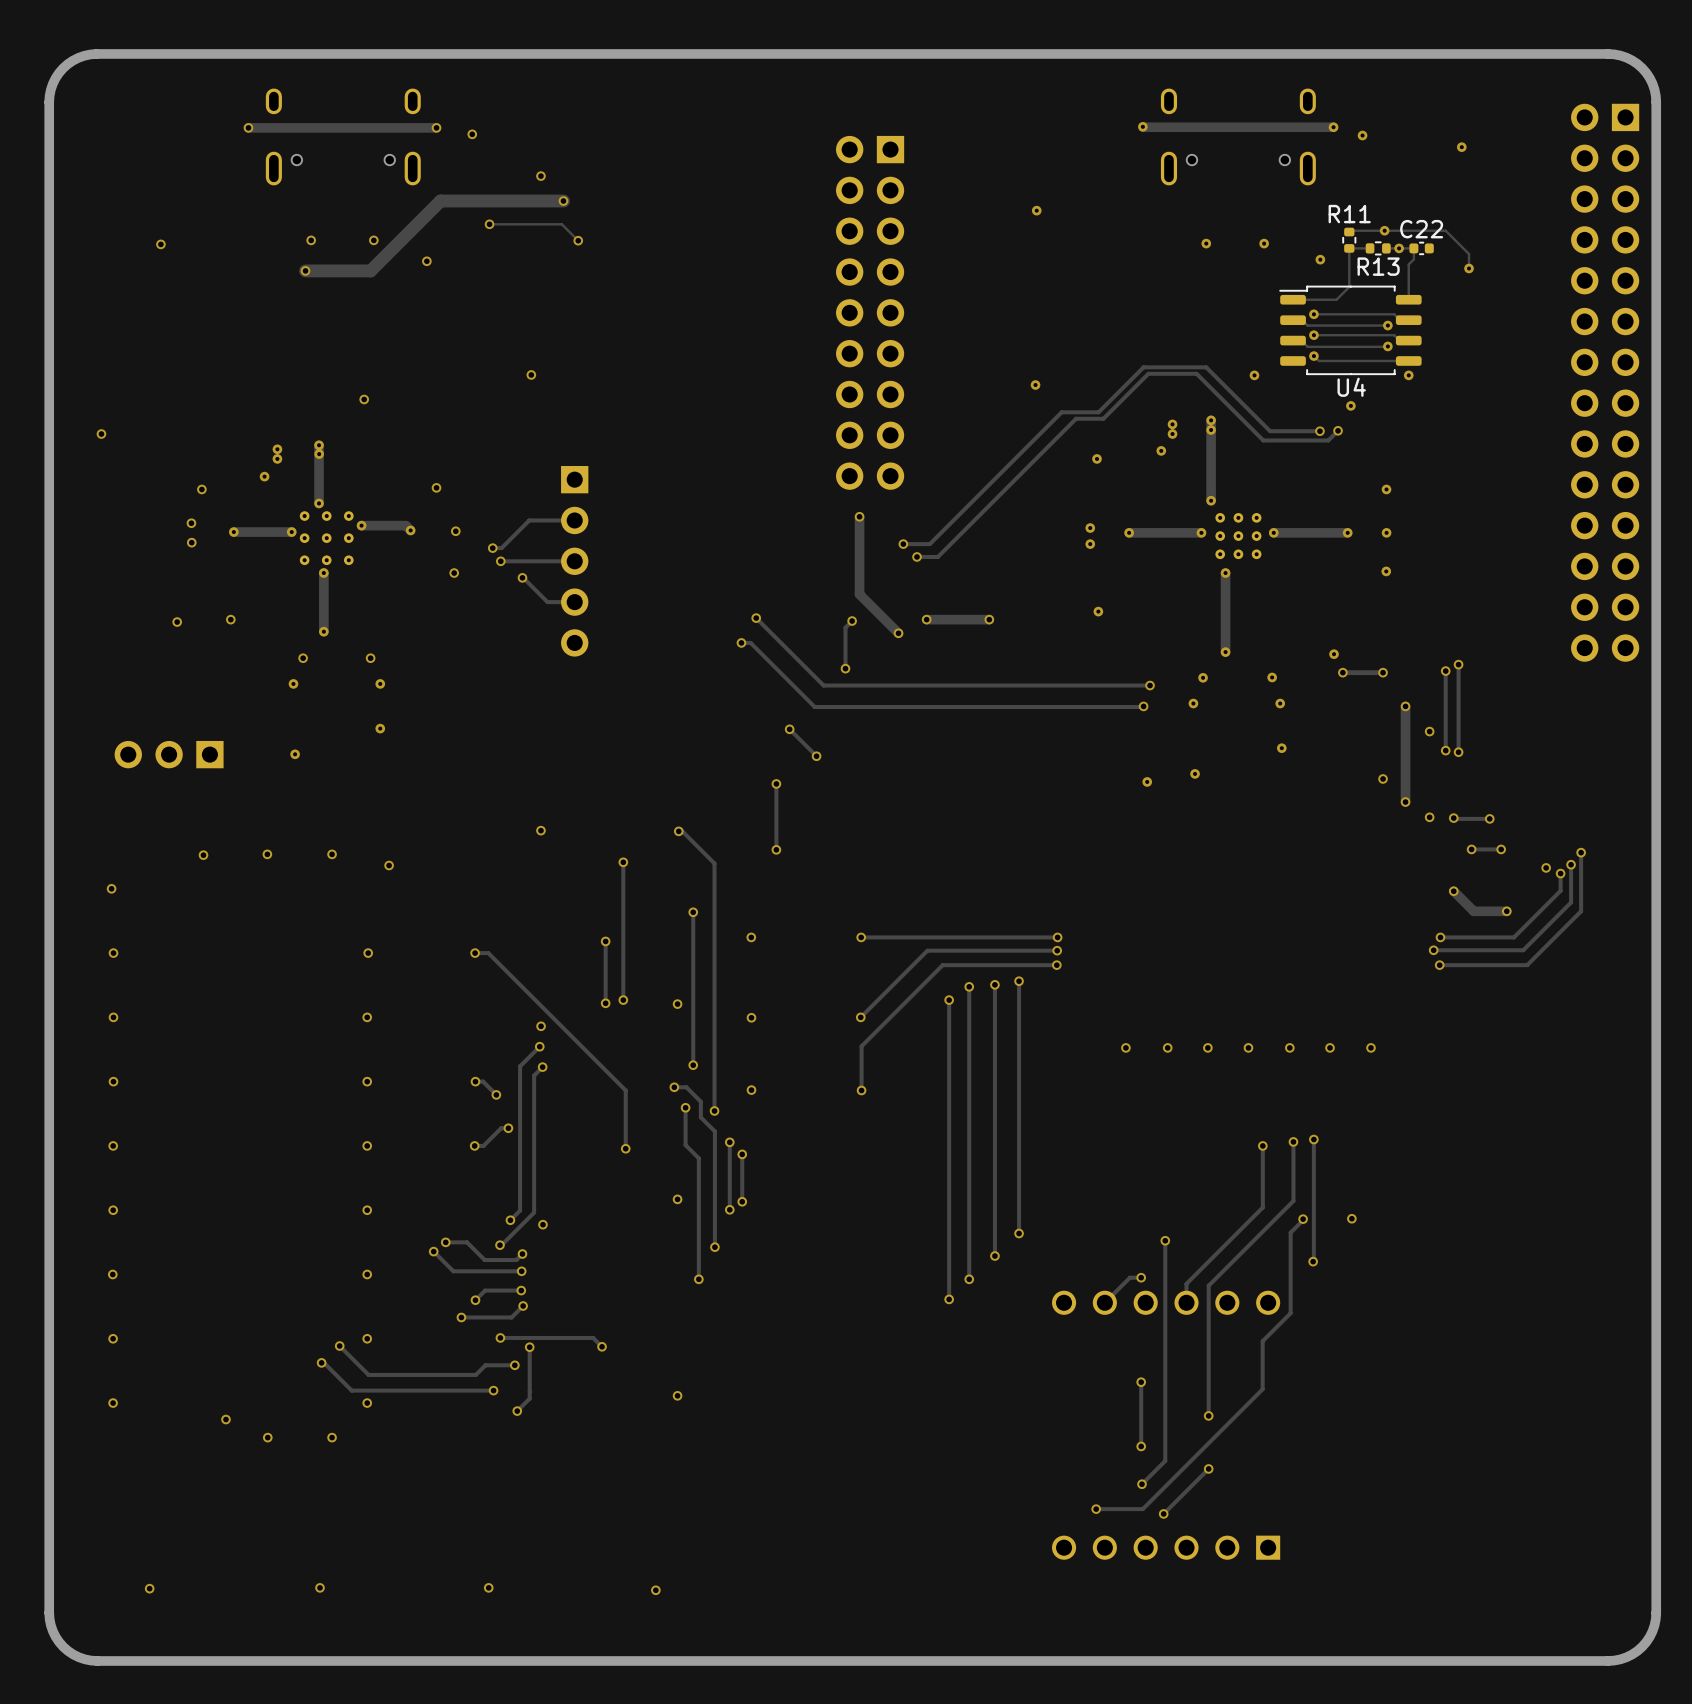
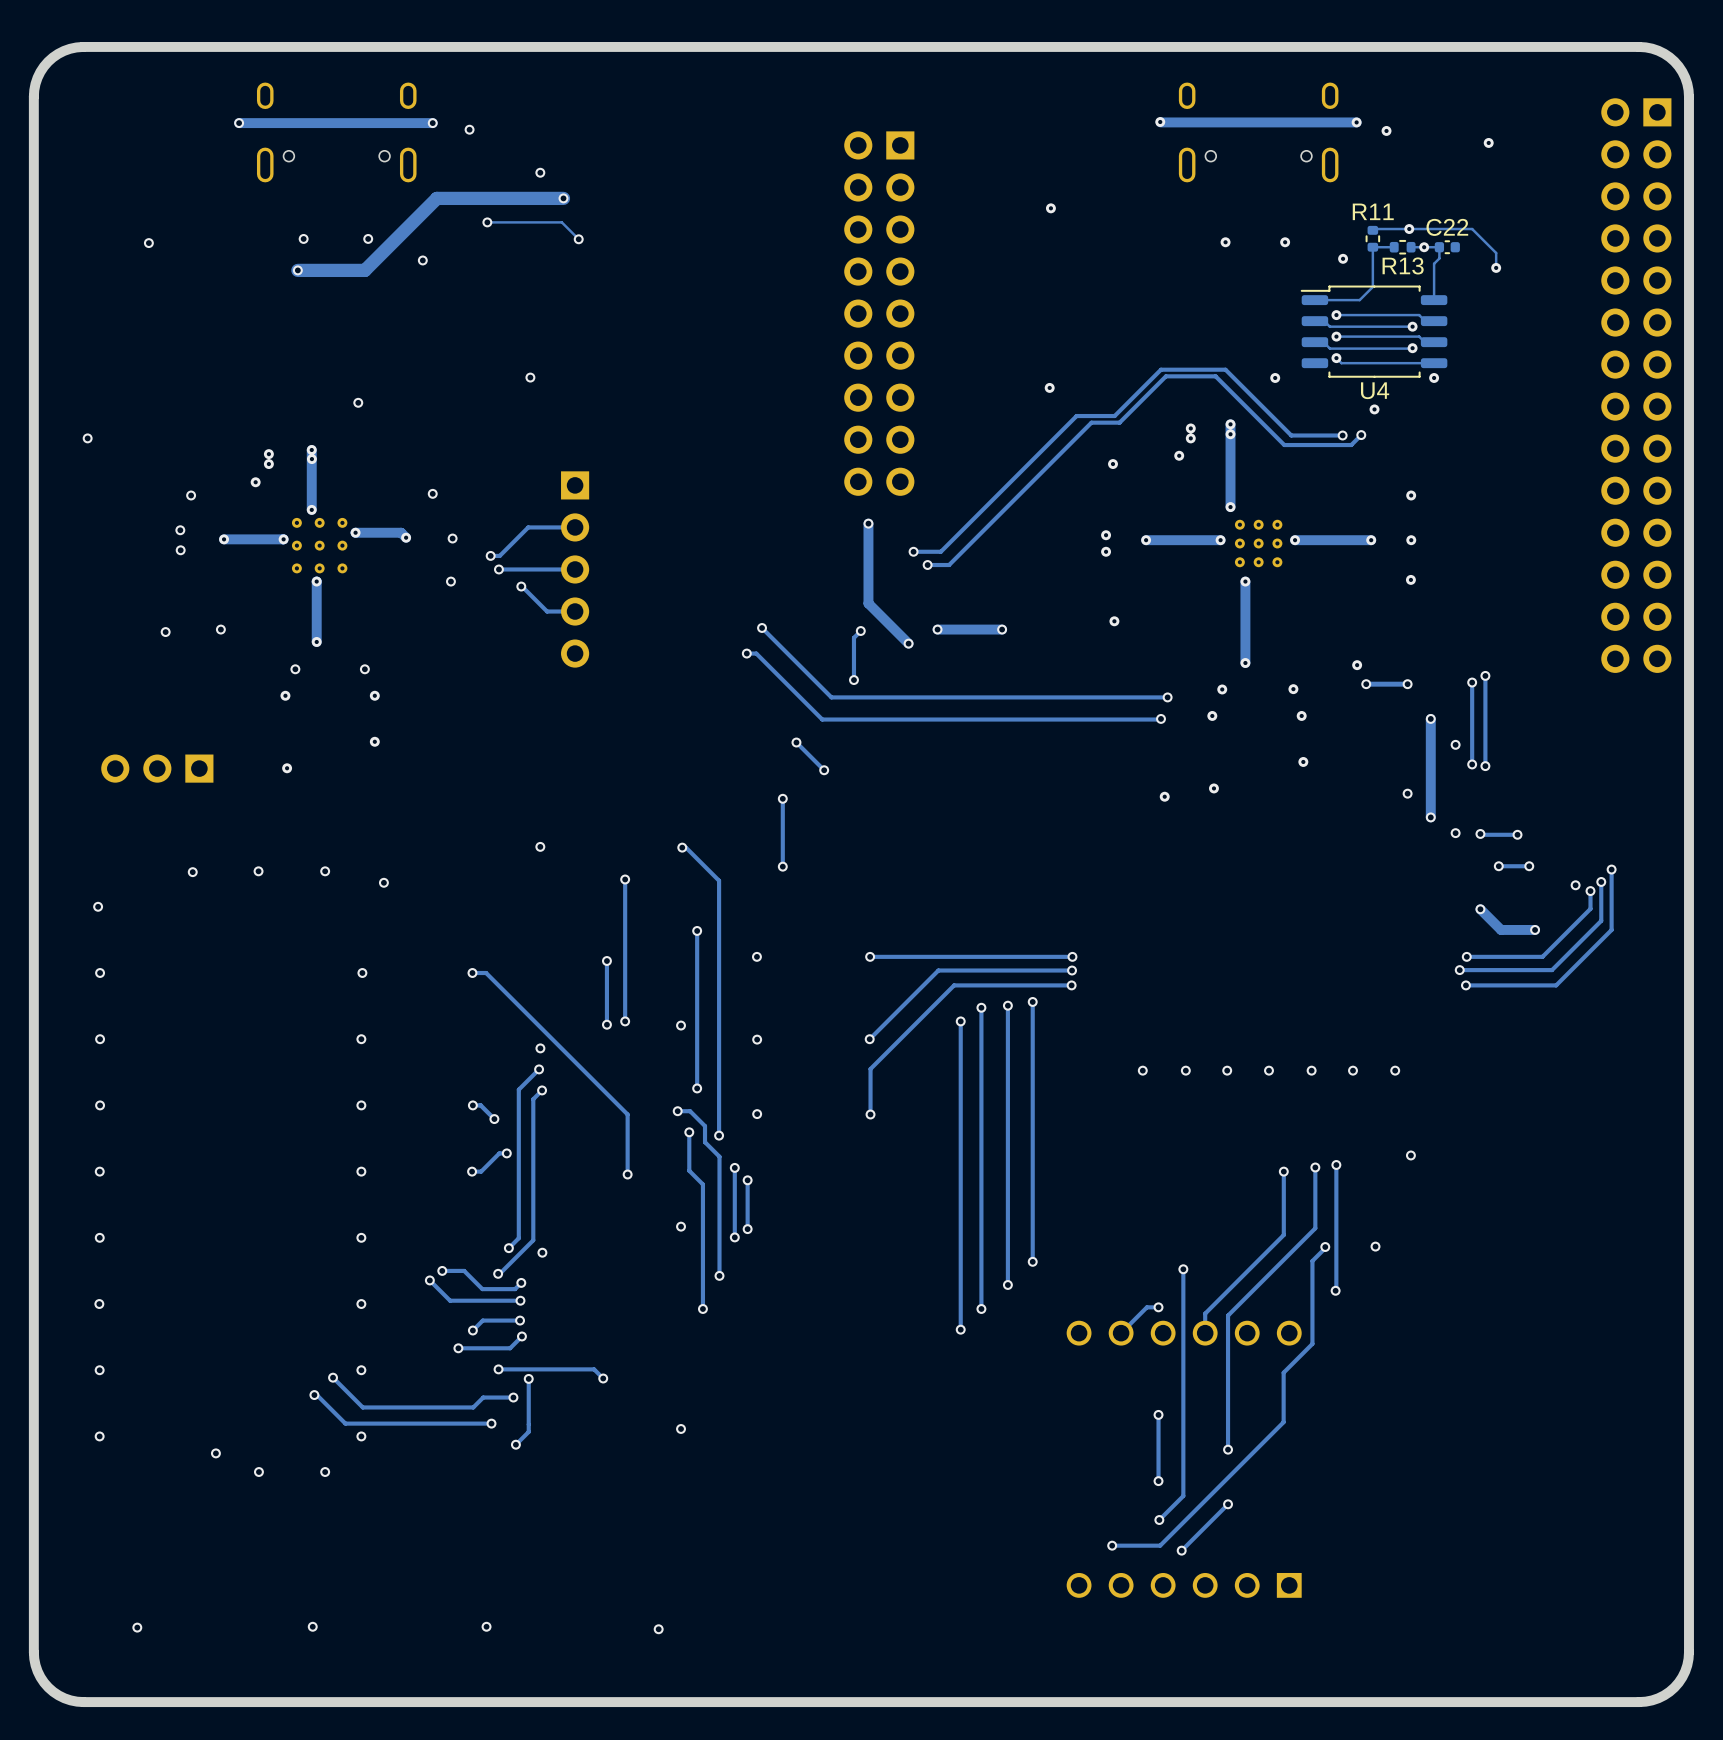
via: none -> (1410, 1155)

